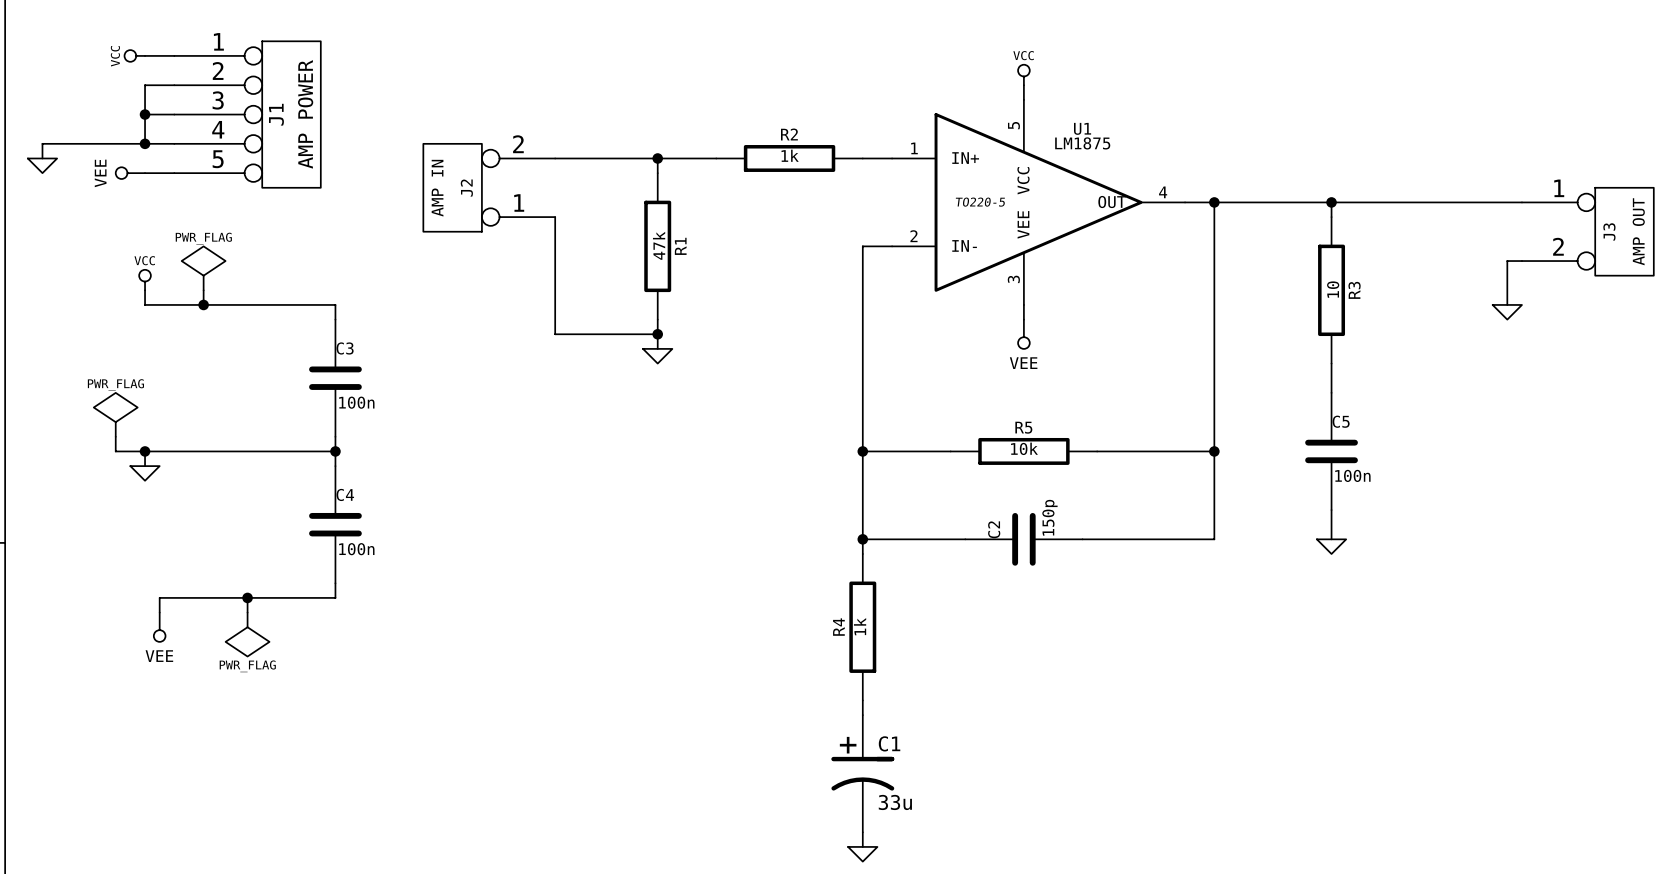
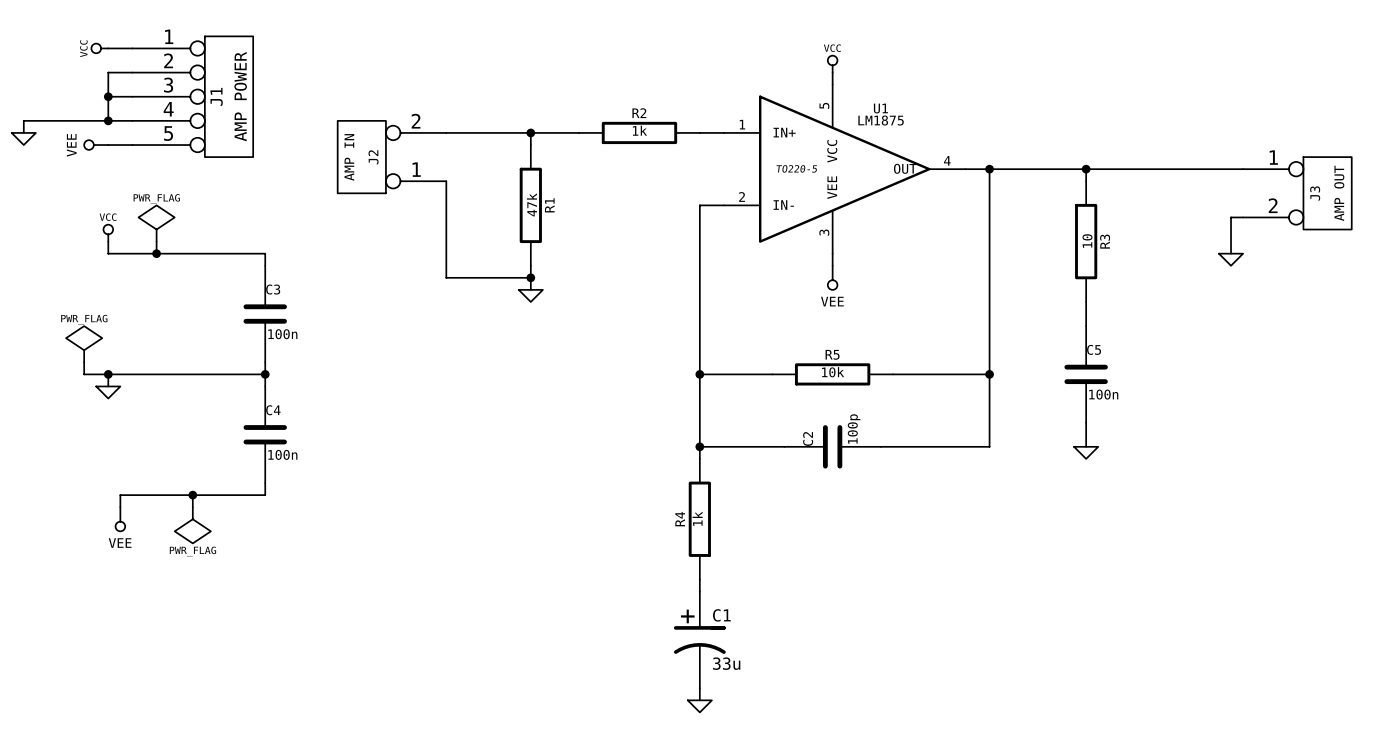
C2 value: 150p (1049, 517) -> 100p (854, 429)

